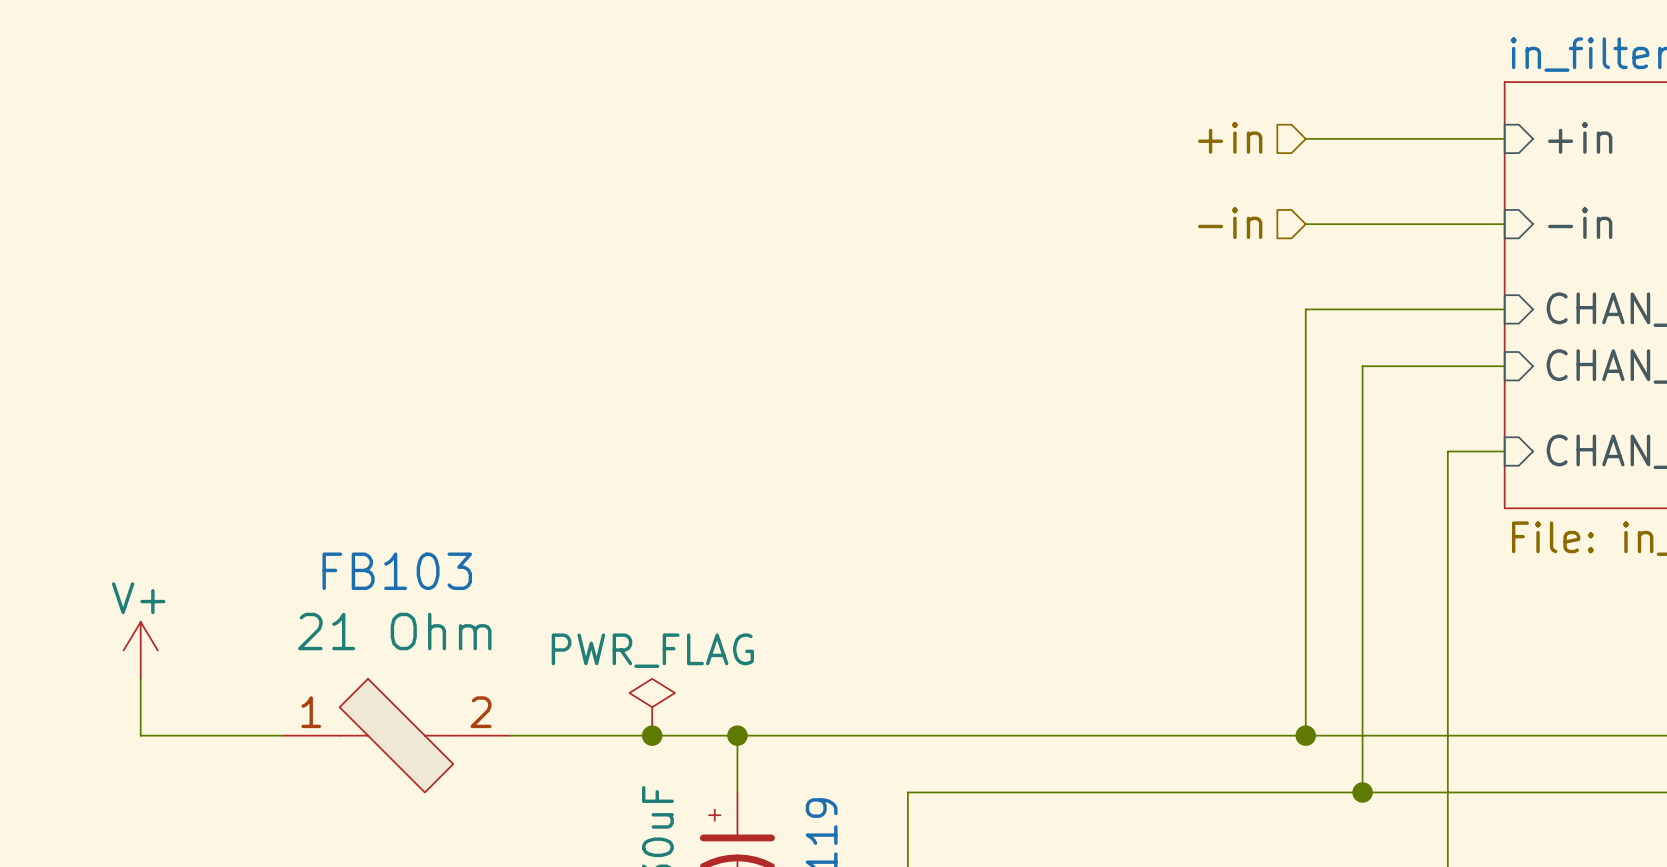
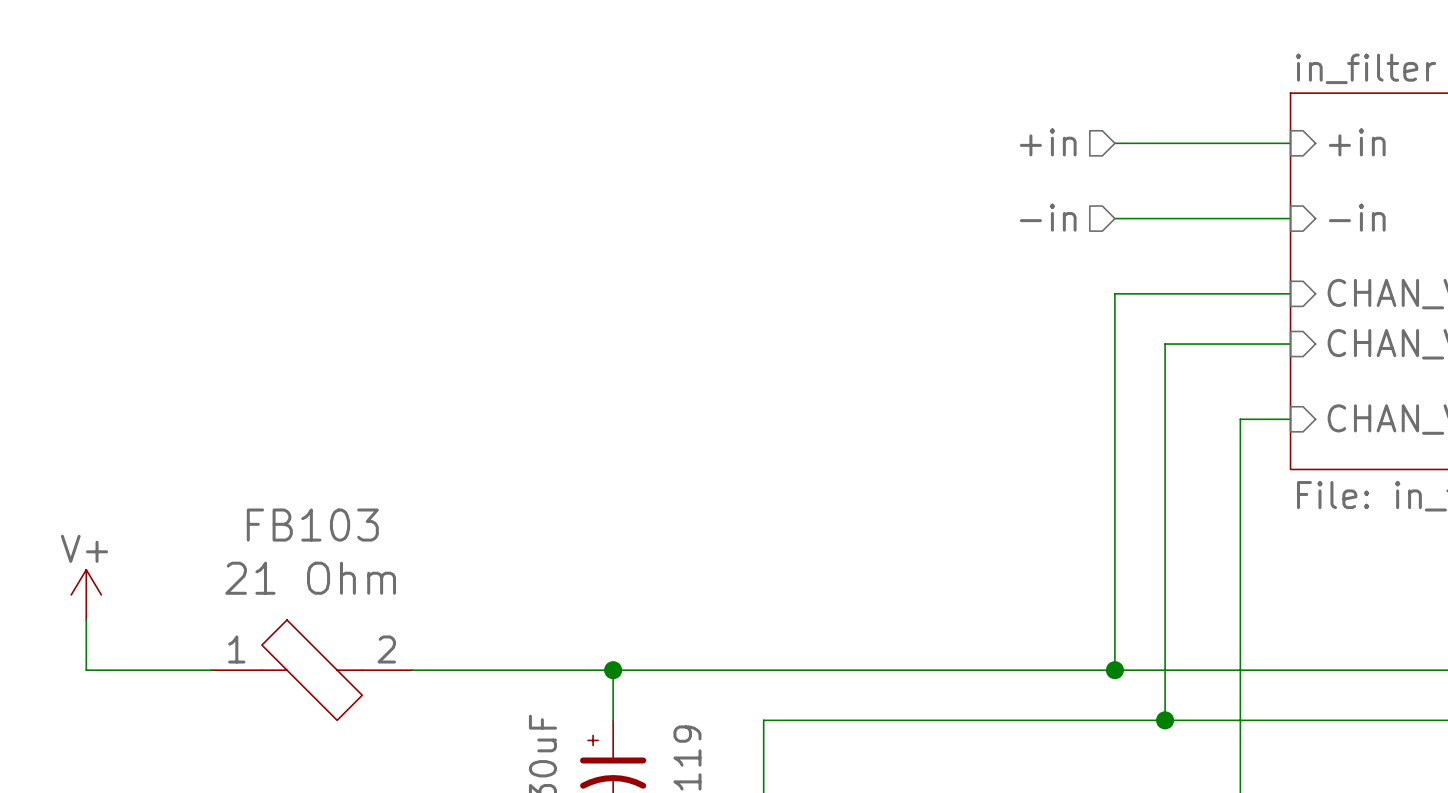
power symbol: PWR_FLAG (652, 707) -> none
junction: (652, 735) -> none

